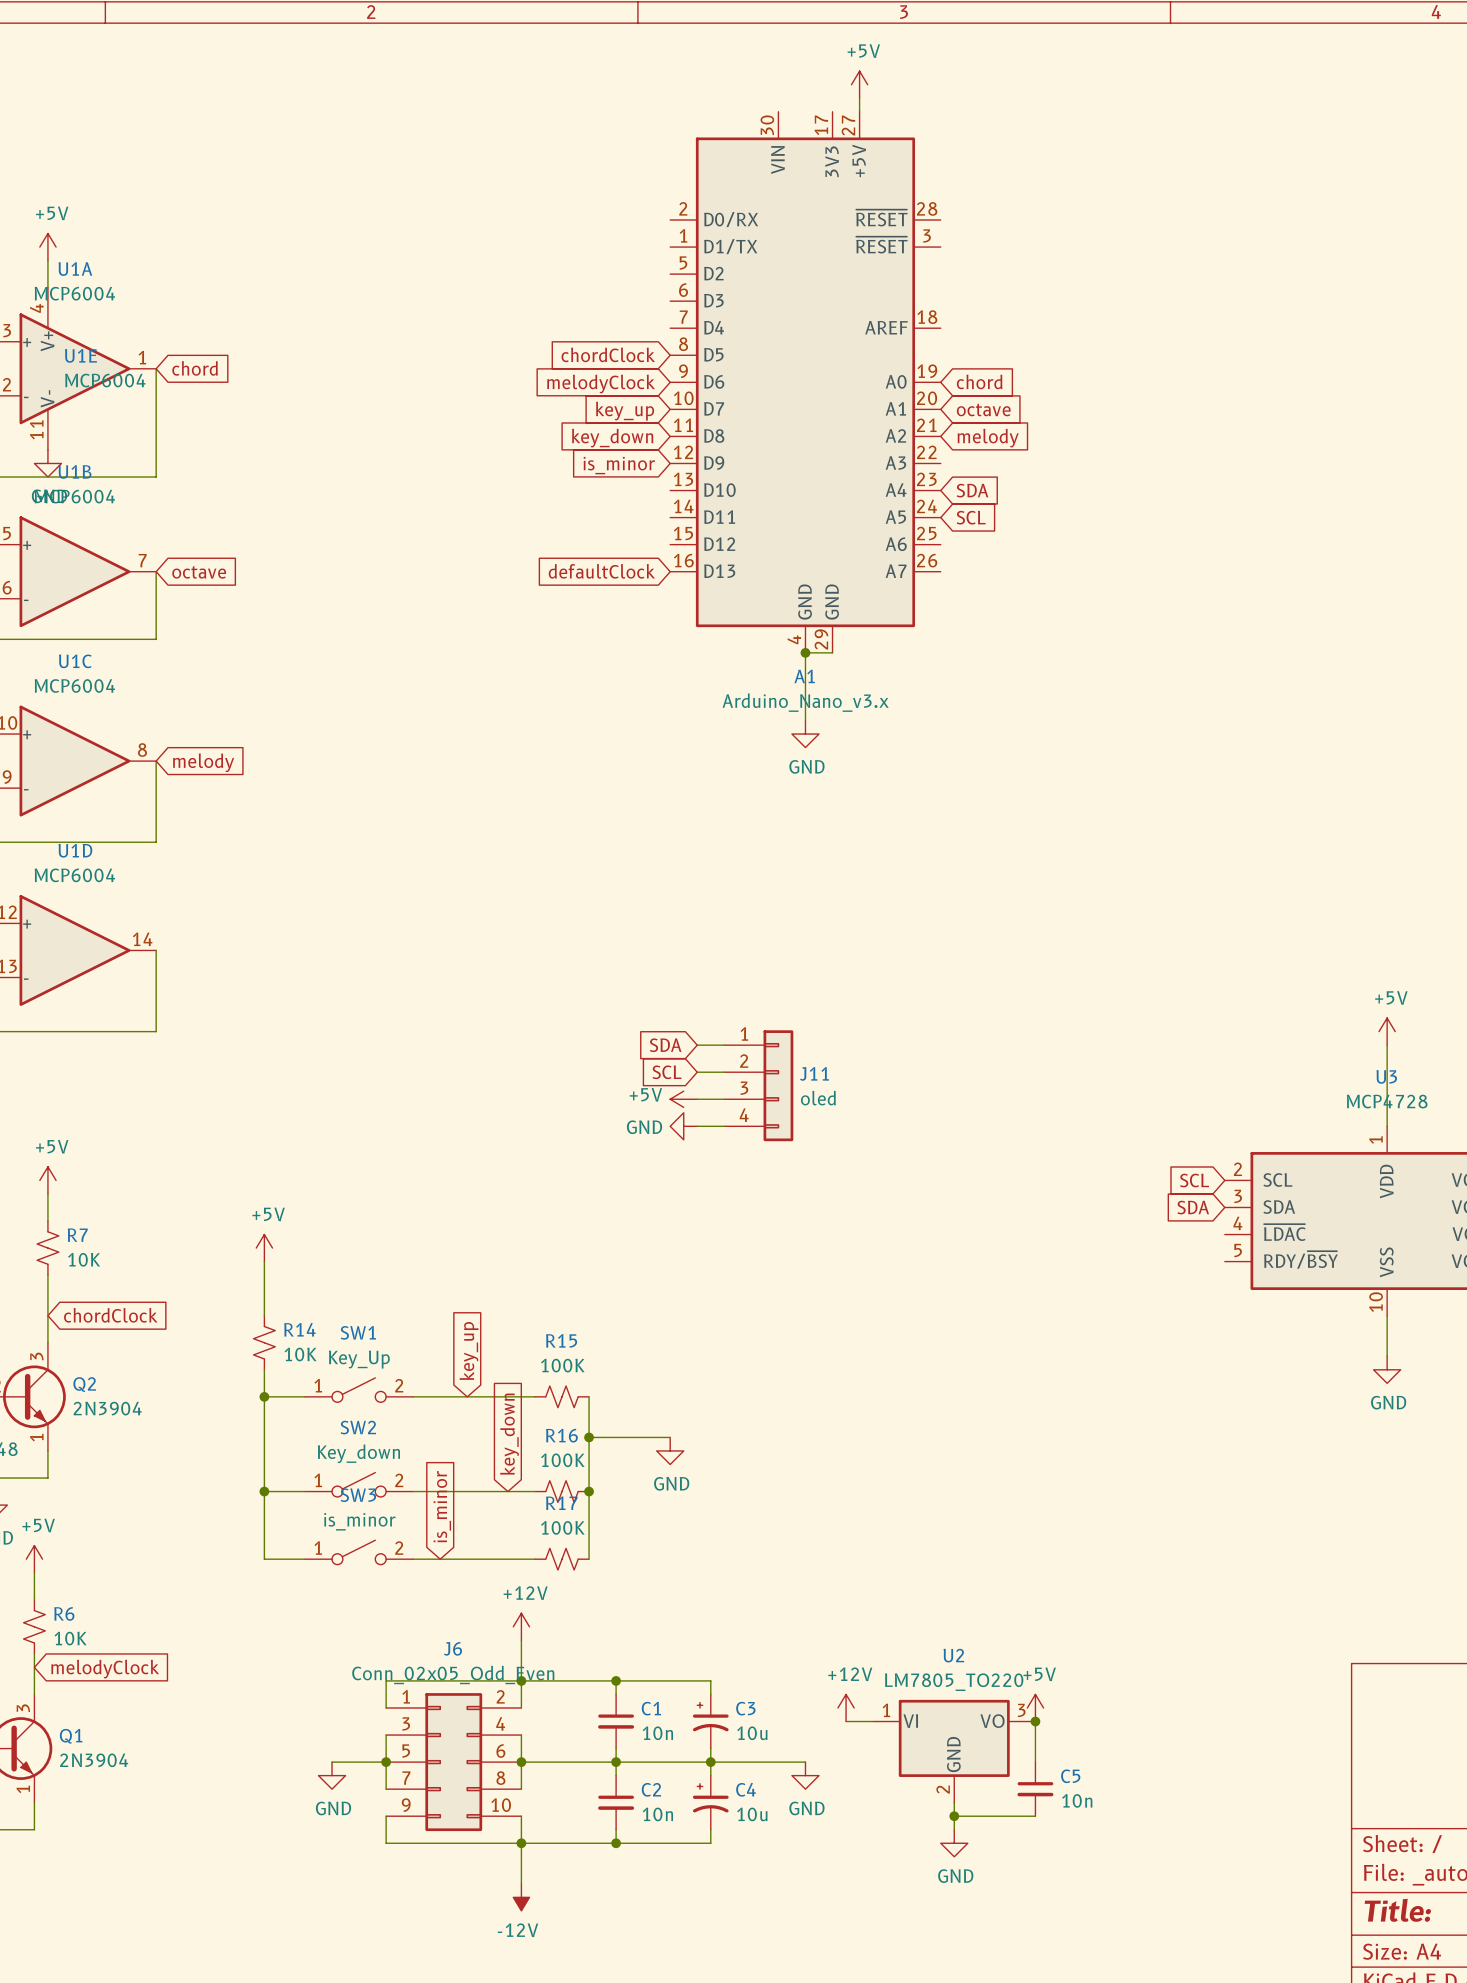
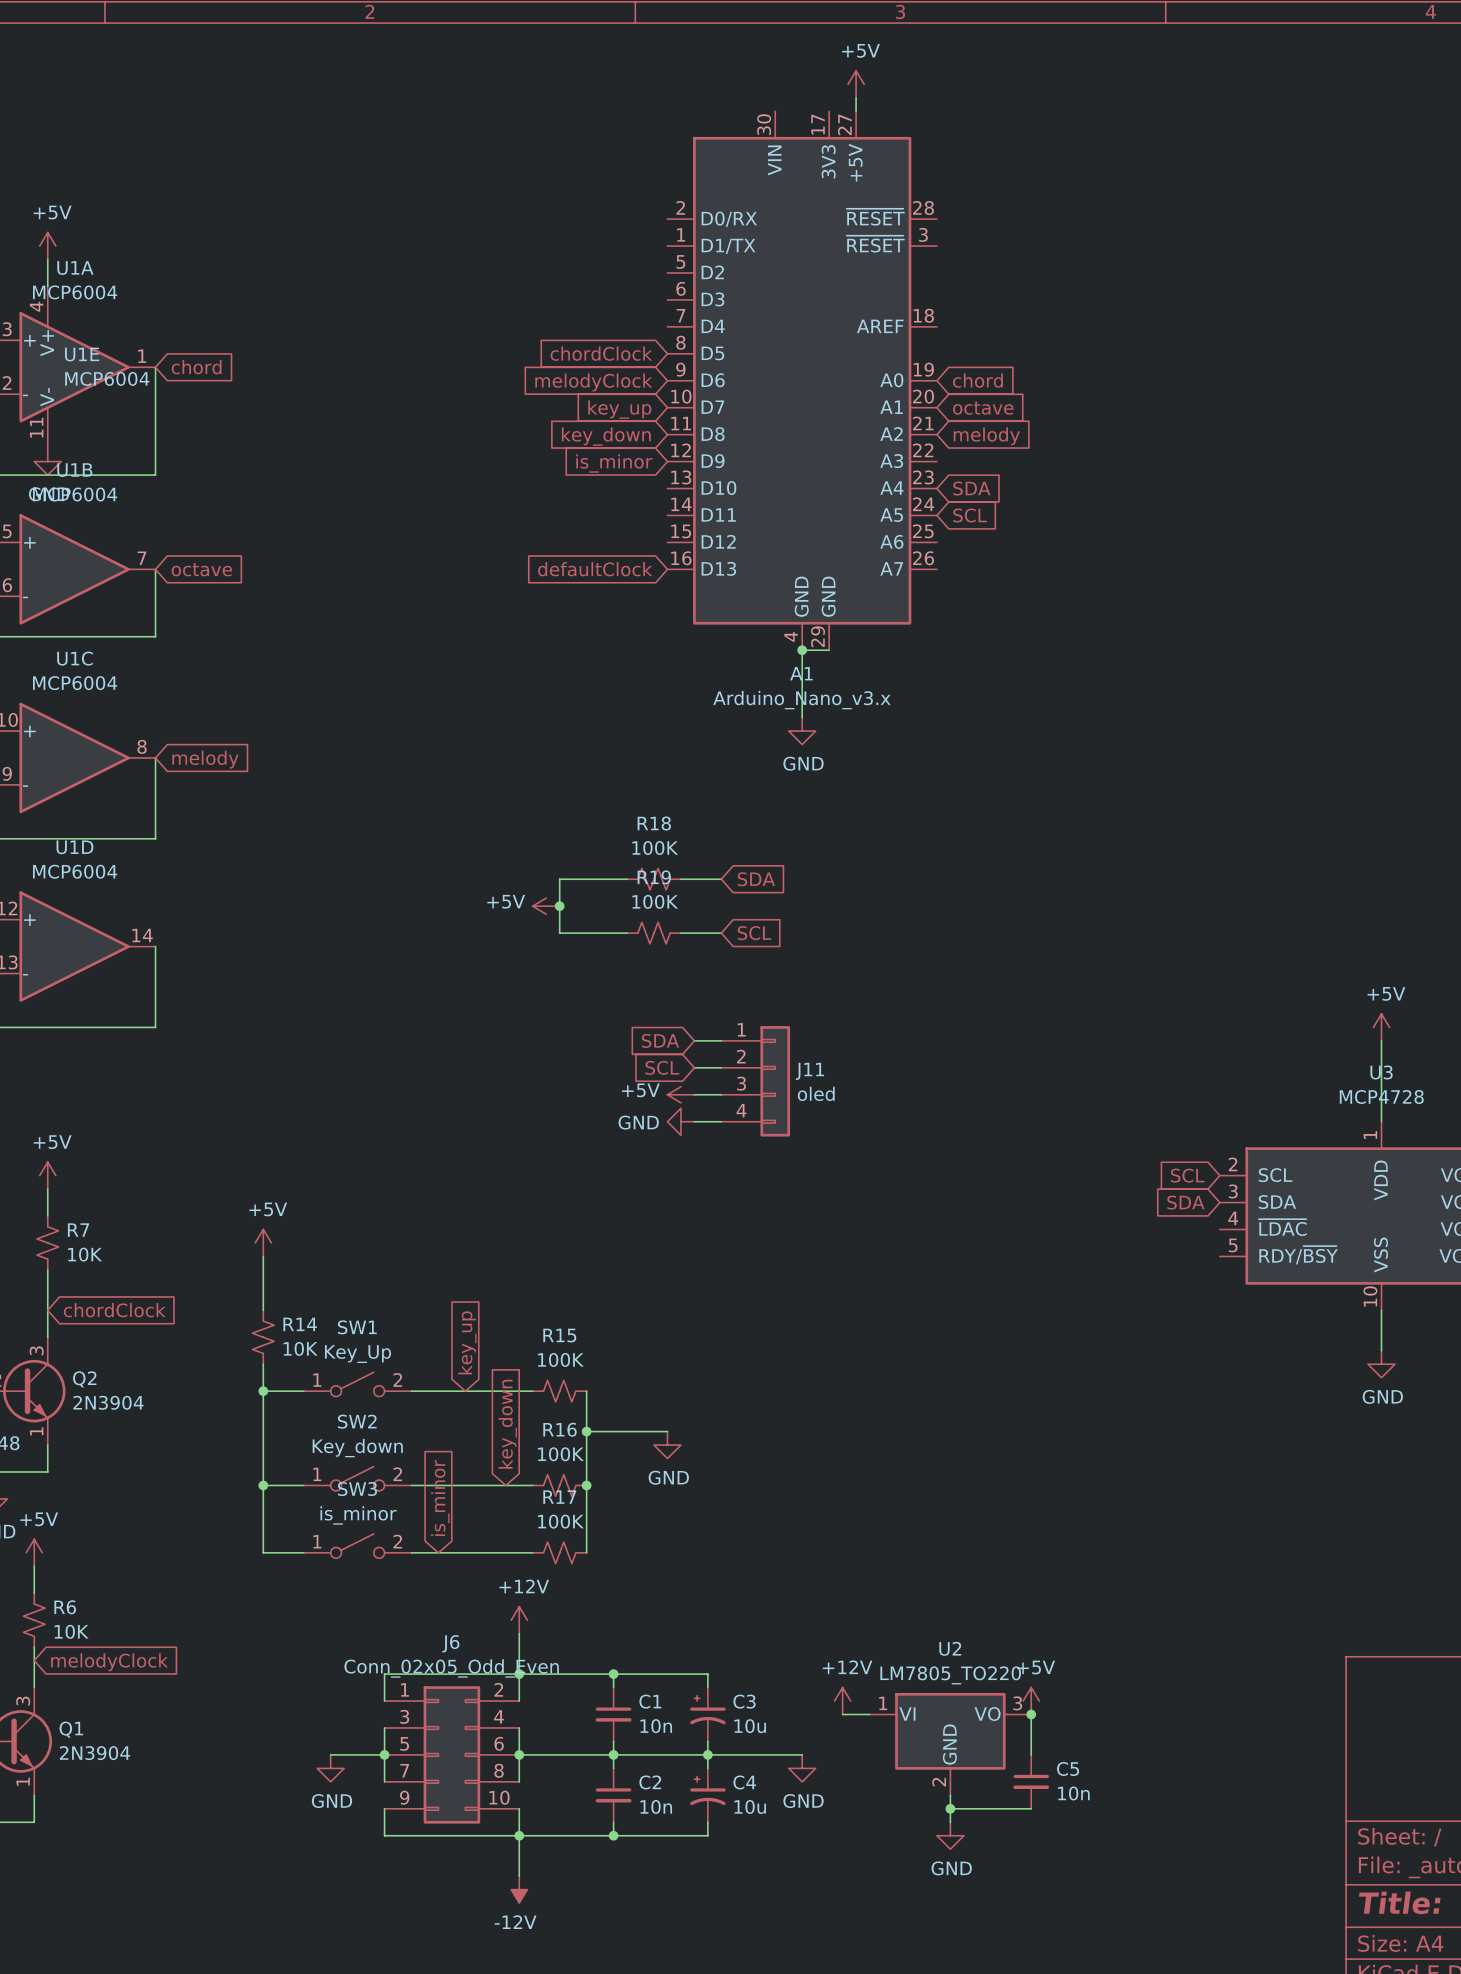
wire: none -> (627, 879) (559, 879) (559, 933) (627, 933)
R18: none -> 100K (654, 879)
wire: none -> (680, 879) (721, 879)
global label: none -> SDA (756, 879)
power symbol: none -> +5V (546, 906)
junction: none -> (559, 906)
R19: none -> 100K (654, 933)
wire: none -> (680, 933) (721, 933)
global label: none -> SCL (754, 933)

